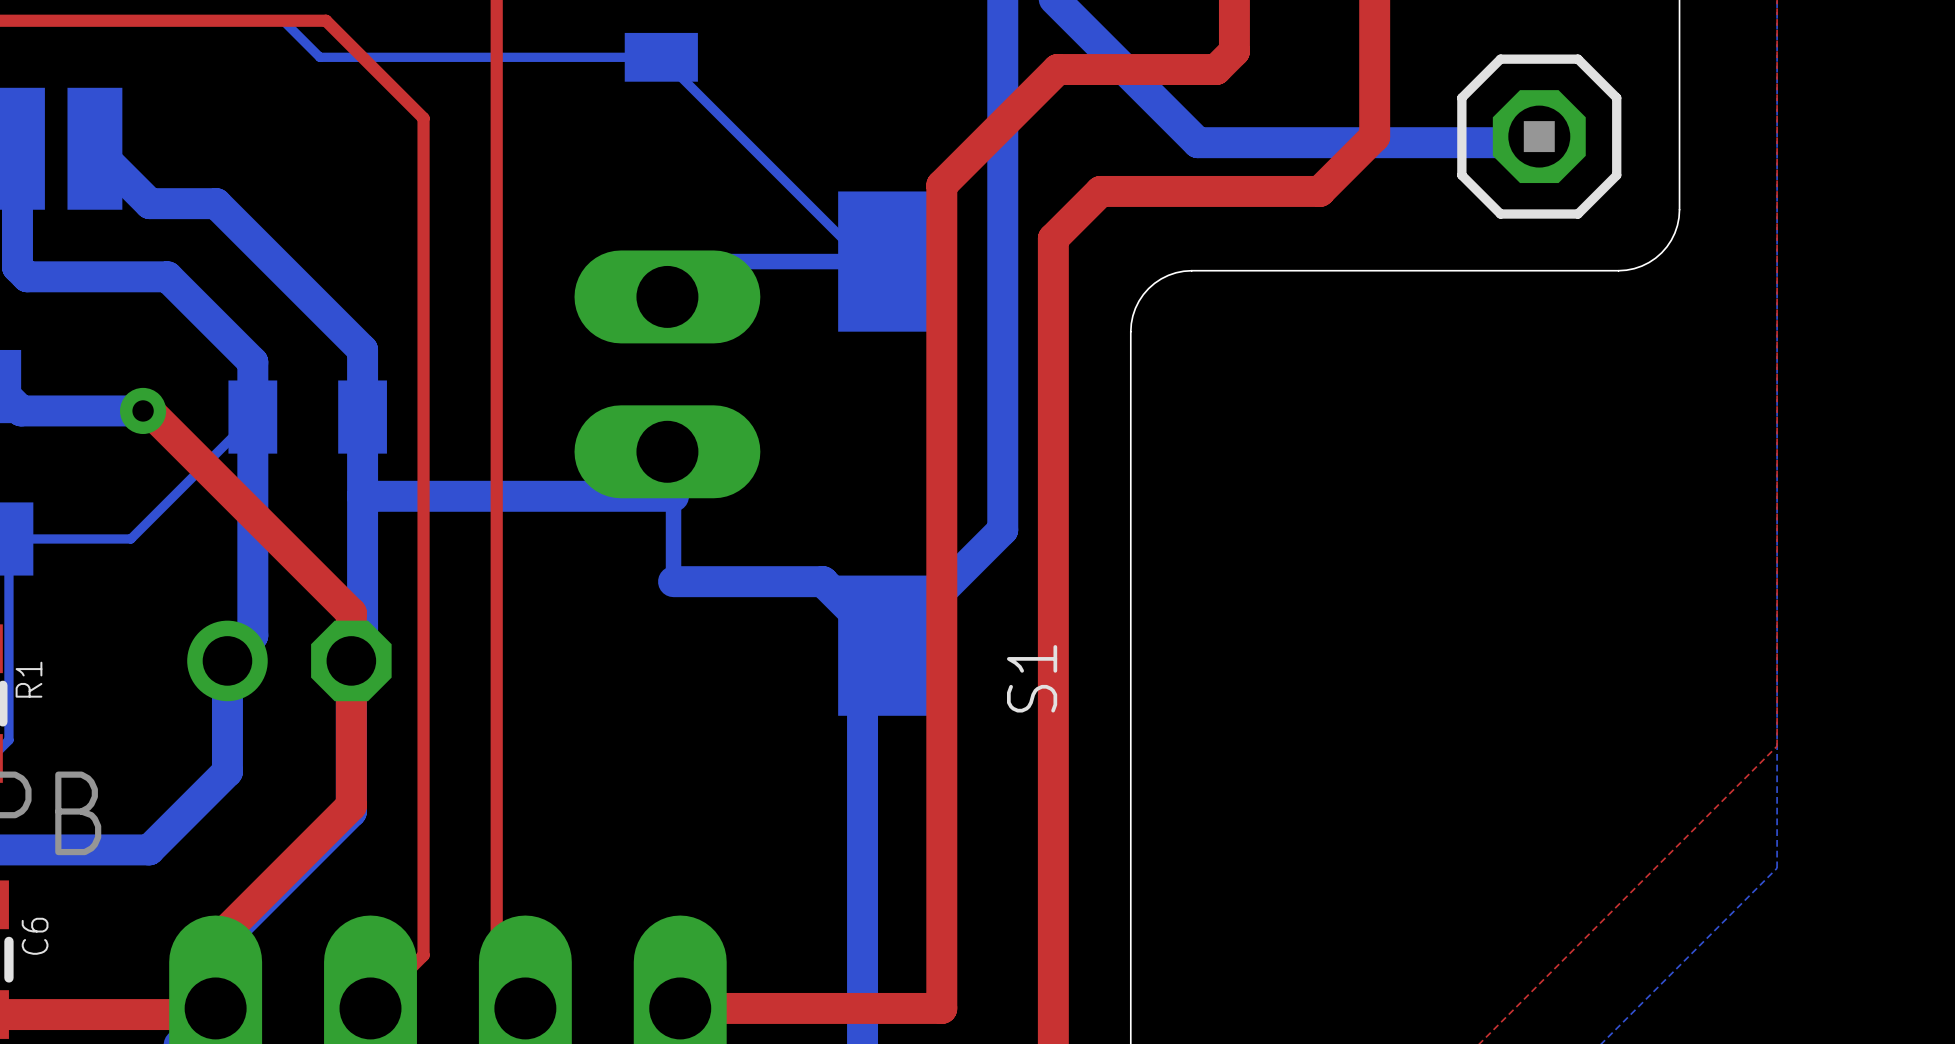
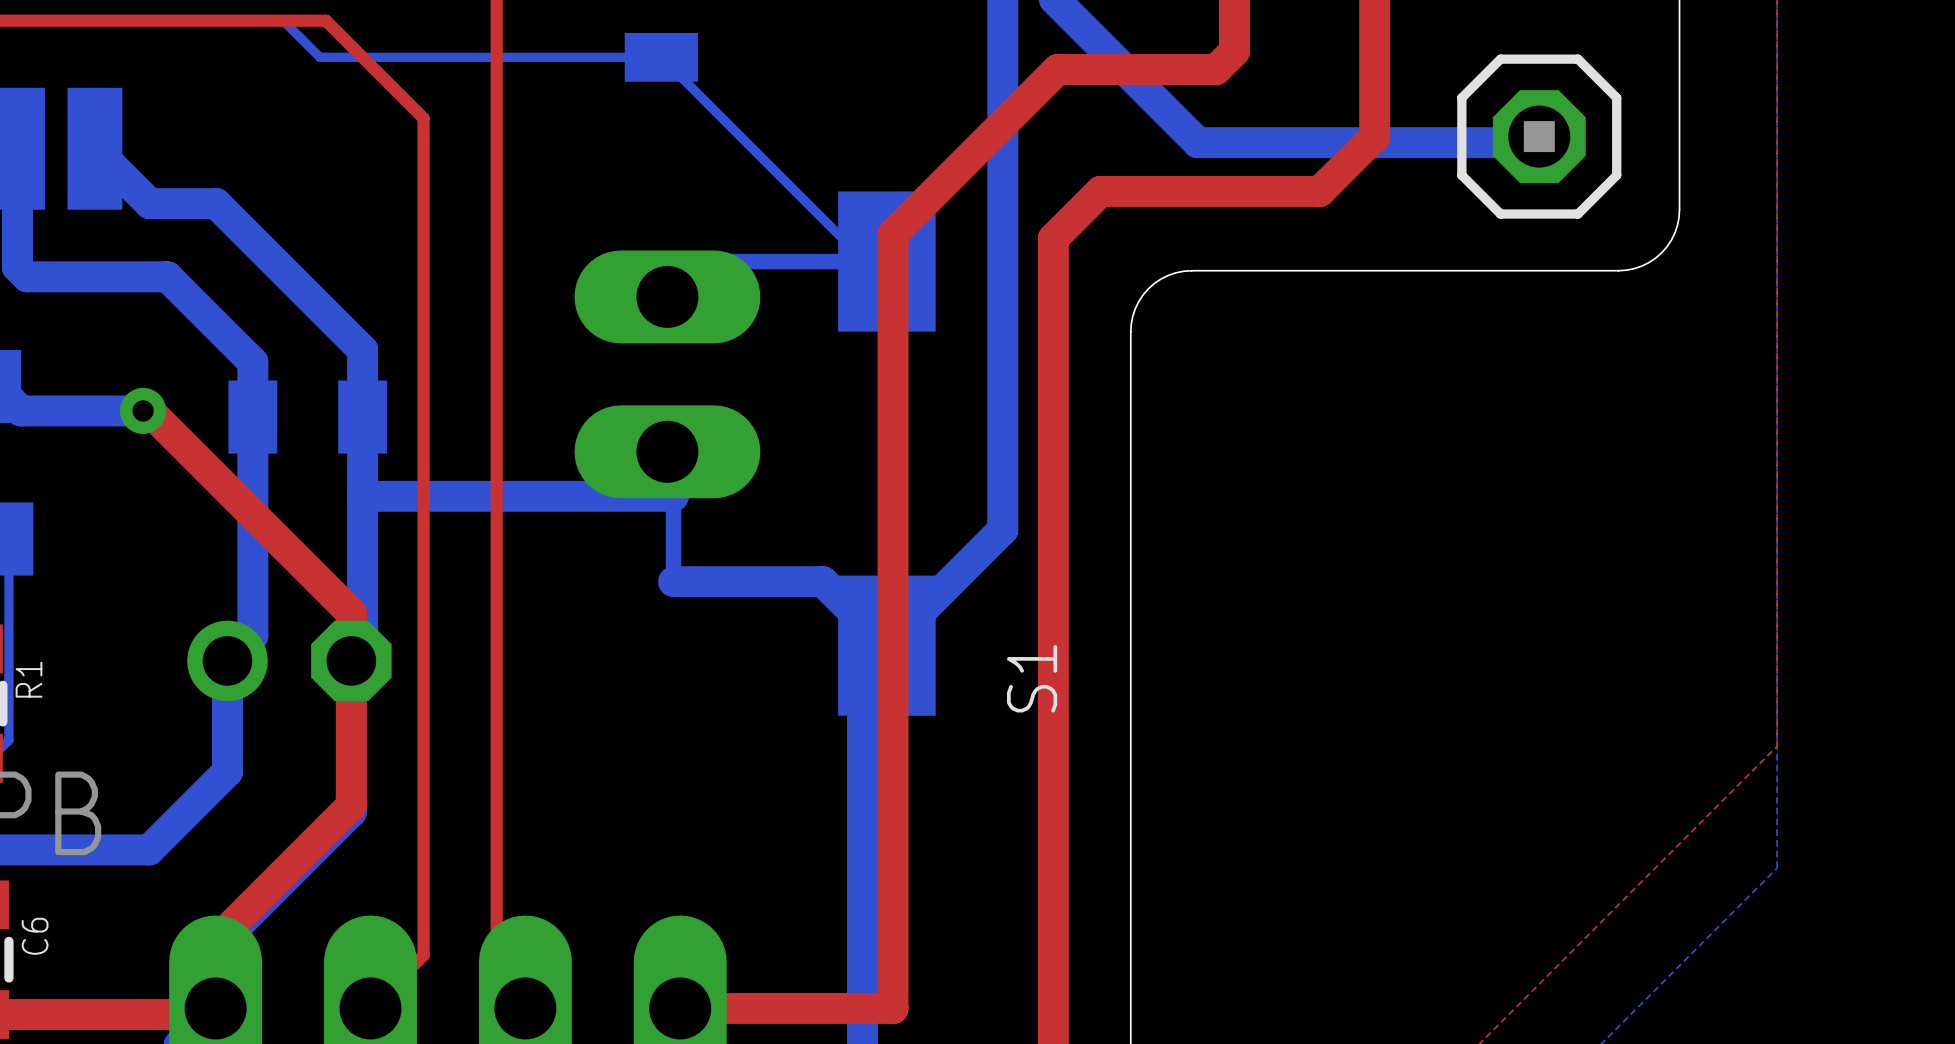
top track: (941, 185) (941, 1008) (893, 1008) -> (941, 185) (893, 234) (893, 1008)
bottom track: (252, 417) (130, 538) (8, 538) -> none

